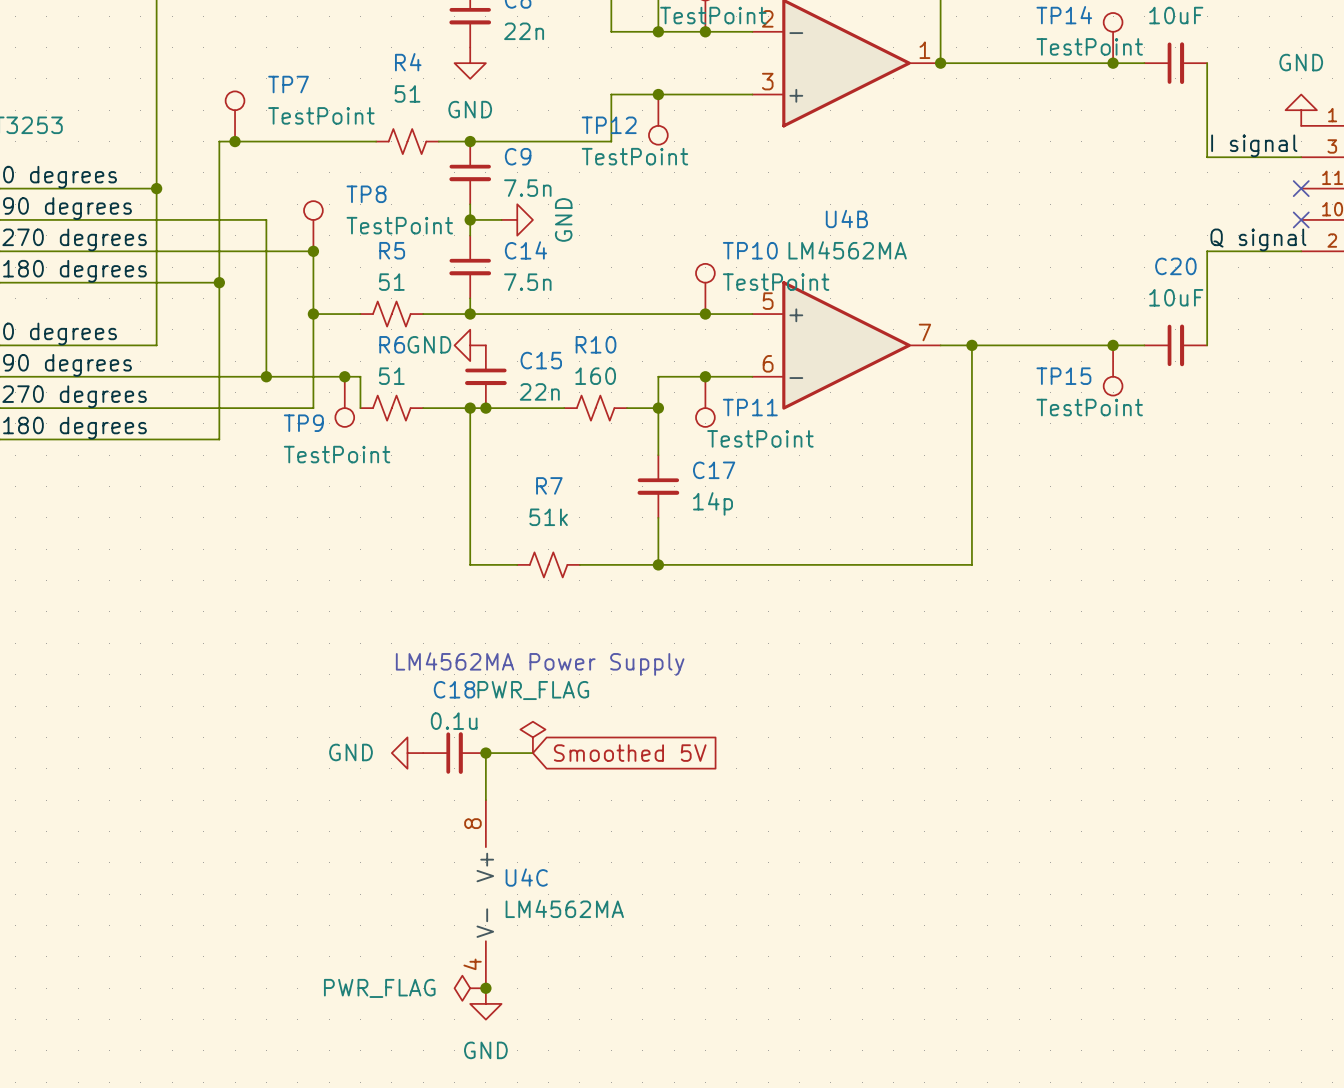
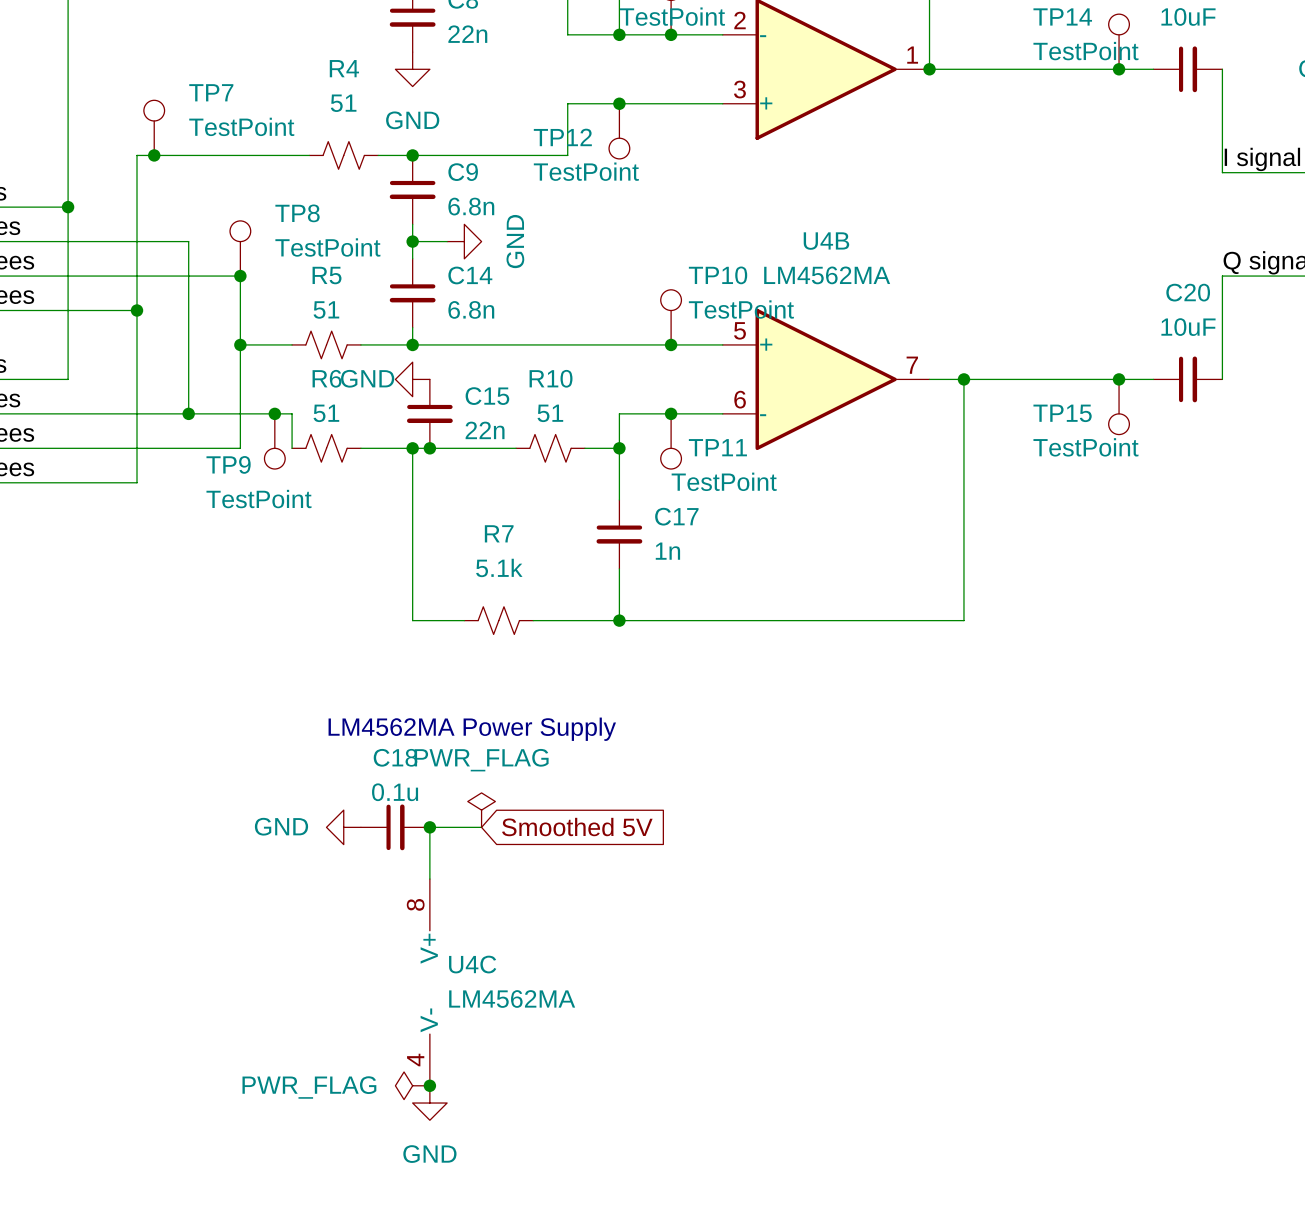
C9 value: 7.5n (527, 188) -> 6.8n (471, 206)
C14 value: 7.5n (527, 282) -> 6.8n (471, 309)
R10 value: 160 (595, 376) -> 51 (550, 413)
C17 value: 14p (712, 503) -> 1n (667, 551)
R7 value: 51k (548, 517) -> 5.1k (499, 567)

